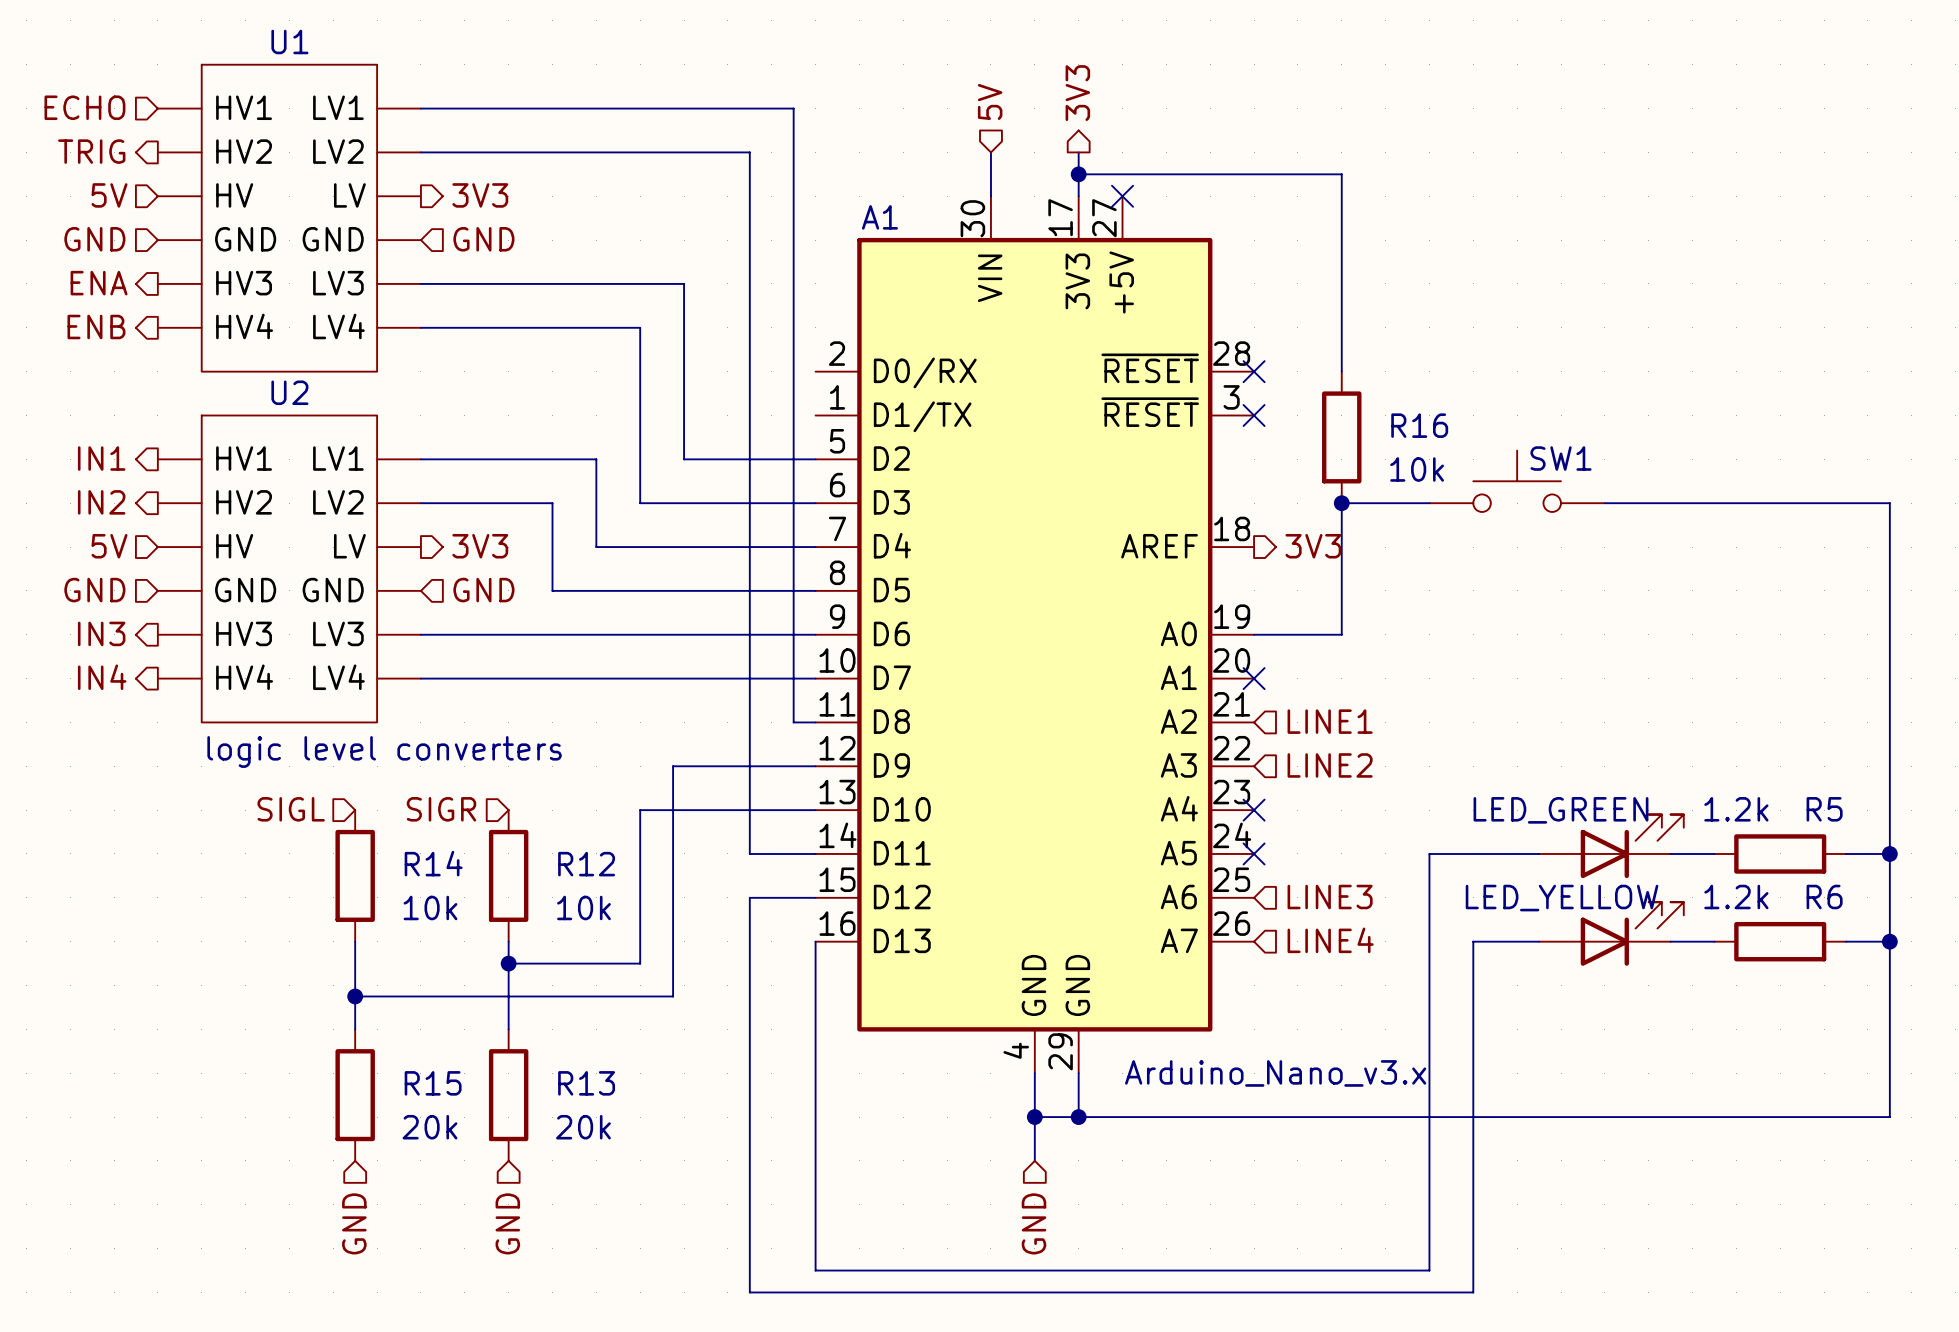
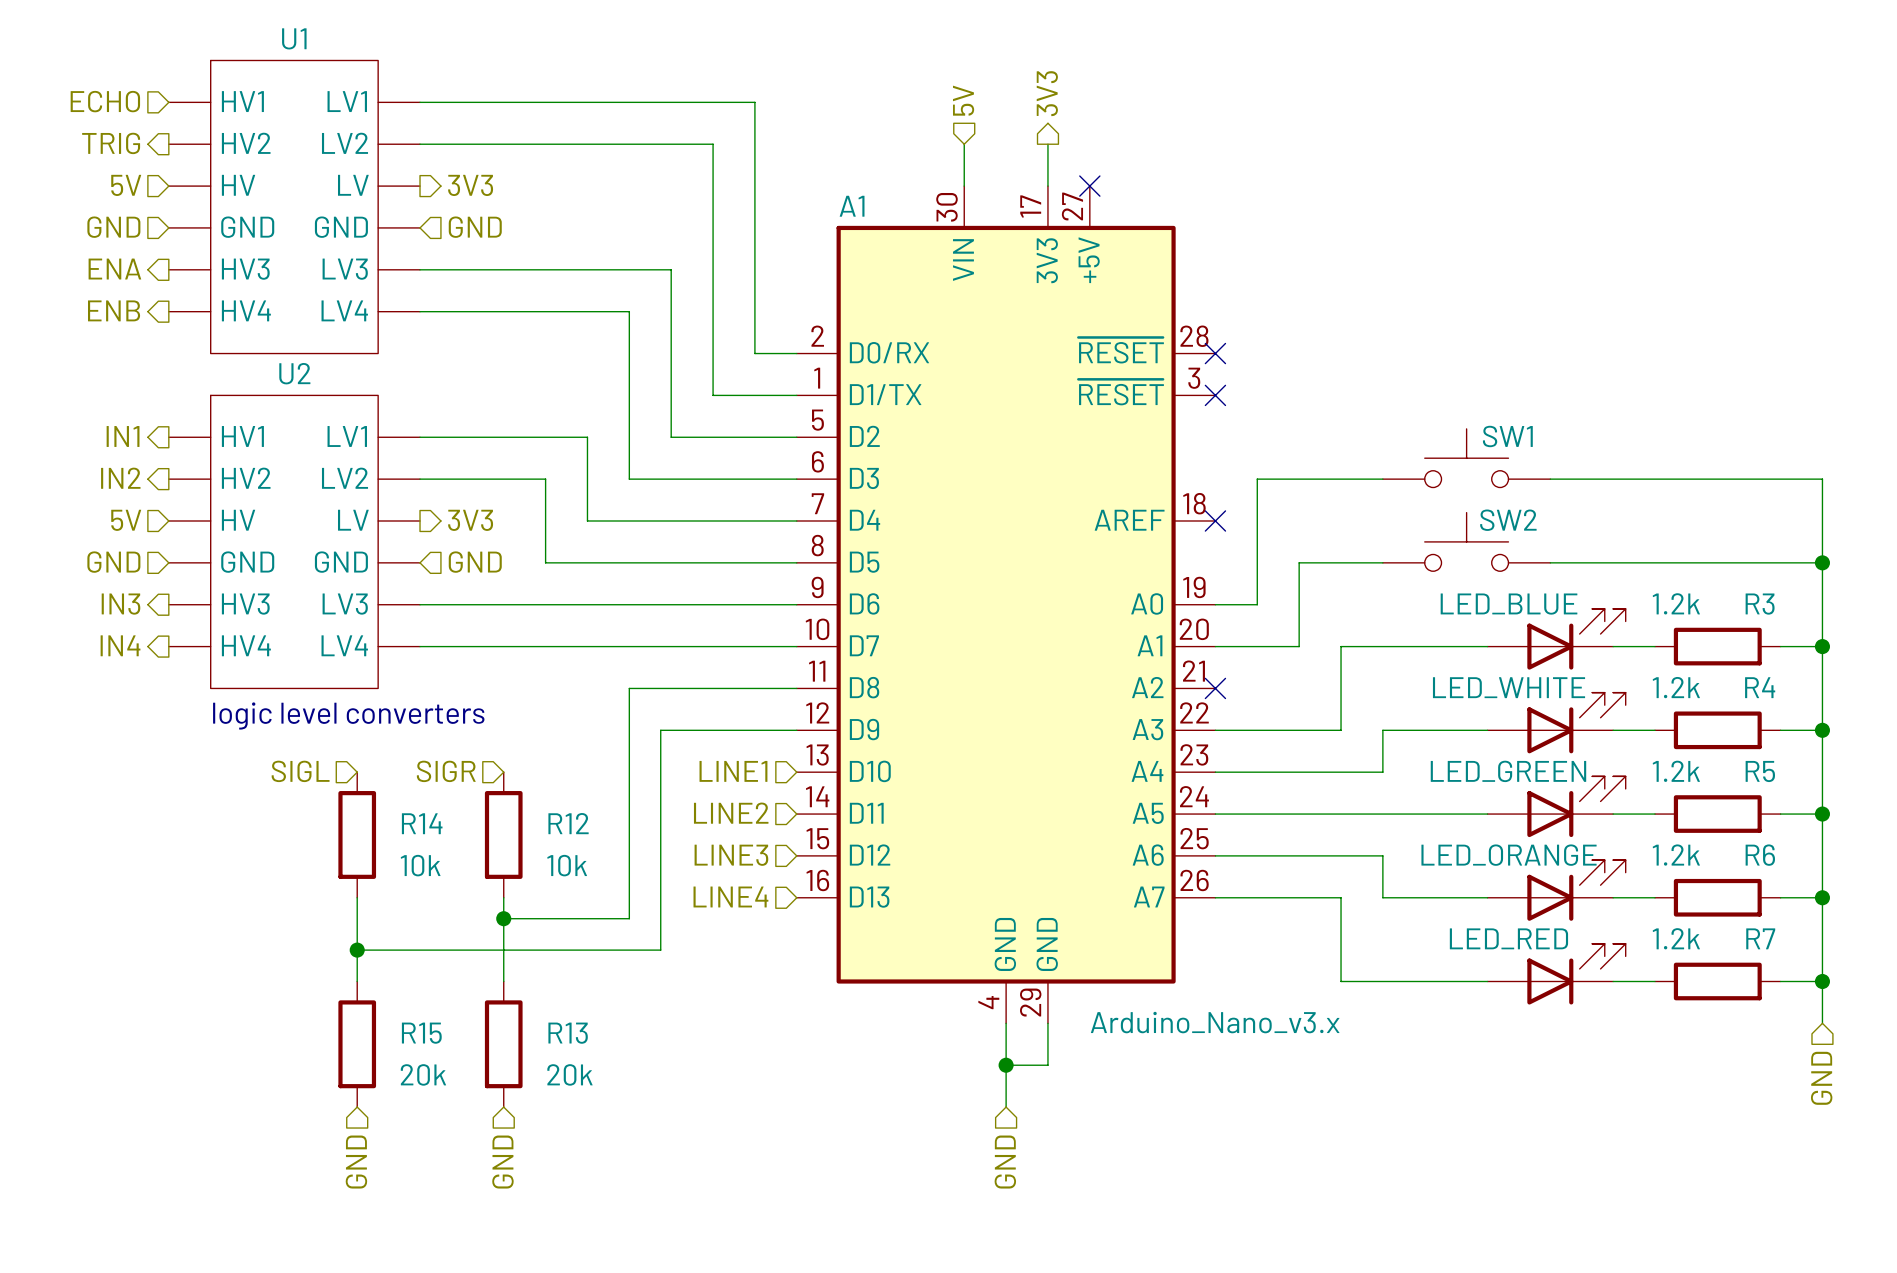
wire: (771, 108) (793, 108) (793, 722) -> (754, 102) (754, 353) (796, 353)
wire: (727, 152) (749, 152) (749, 853) (815, 853) -> (713, 144) (713, 395) (796, 395)
wire: (1078, 174) (1341, 174) (1341, 371) -> none
junction: (1078, 174) -> none
R16: 10k (1341, 437) -> none
wire: (1341, 503) (1341, 590) -> (1299, 479) (1257, 479) (1257, 604)
junction: (1341, 503) -> none
hierarchical label: 3V3 (1313, 546) -> none
no-connect mark: none -> (1215, 520)
SW2: none -> (1466, 541)
wire: none -> (1299, 562) (1382, 562)
wire: none -> (1550, 562) (1822, 562)
junction: none -> (1822, 562)
wire: (1297, 634) (1341, 634) -> (1215, 646) (1299, 646) (1299, 604)
part: none -> LED_BLUE (1556, 639)
no-connect mark: (1254, 678) -> none
wire: none -> (1487, 646) (1341, 646) (1341, 730) (1215, 730)
wire: none -> (1613, 646) (1655, 646)
R3: none -> 1.2k (1717, 646)
wire: none -> (1780, 646) (1822, 646)
junction: none -> (1822, 646)
hierarchical label: LINE1 (1330, 721) -> none
no-connect mark: none -> (1215, 688)
part: none -> LED_WHITE (1556, 722)
hierarchical label: LINE2 (1330, 765) -> none
wire: none -> (1487, 730) (1382, 730) (1382, 772) (1215, 772)
wire: none -> (1613, 730) (1655, 730)
R4: none -> 1.2k (1717, 730)
wire: none -> (1780, 730) (1822, 730)
junction: none -> (1822, 730)
hierarchical label: none -> LINE1 (733, 771)
wire: (640, 810) (815, 810) -> (629, 772) (629, 688) (775, 688)
no-connect mark: (1254, 810) -> none
hierarchical label: none -> LINE2 (731, 813)
no-connect mark: (1254, 853) -> none
wire: (1429, 853) (1429, 897) -> (1382, 814) (1215, 814)
hierarchical label: none -> LINE3 (731, 855)
wire: (815, 897) (749, 897) (749, 1292) (1473, 1292) (1473, 941) -> (1382, 897) (1424, 897)
wire: none -> (1215, 855) (1382, 855)
hierarchical label: LINE3 (1330, 897) -> none
part value: LED_YELLOW (1562, 898) -> LED_ORANGE (1509, 855)
hierarchical label: none -> LINE4 (730, 896)
hierarchical label: LINE4 (1330, 940) -> none
wire: (815, 941) (815, 1270) (1429, 1270) (1429, 941) -> none
wire: none -> (1215, 897) (1341, 897) (1341, 981) (1487, 981)
part: none -> LED_RED (1556, 974)
wire: none -> (1613, 981) (1655, 981)
R7: none -> 1.2k (1717, 981)
wire: none -> (1780, 981) (1822, 981)
junction: none -> (1822, 981)
wire: (1889, 1073) (1889, 1117) (1078, 1117) -> none
junction: (1078, 1117) -> none
hierarchical label: none -> GND (1821, 1078)

